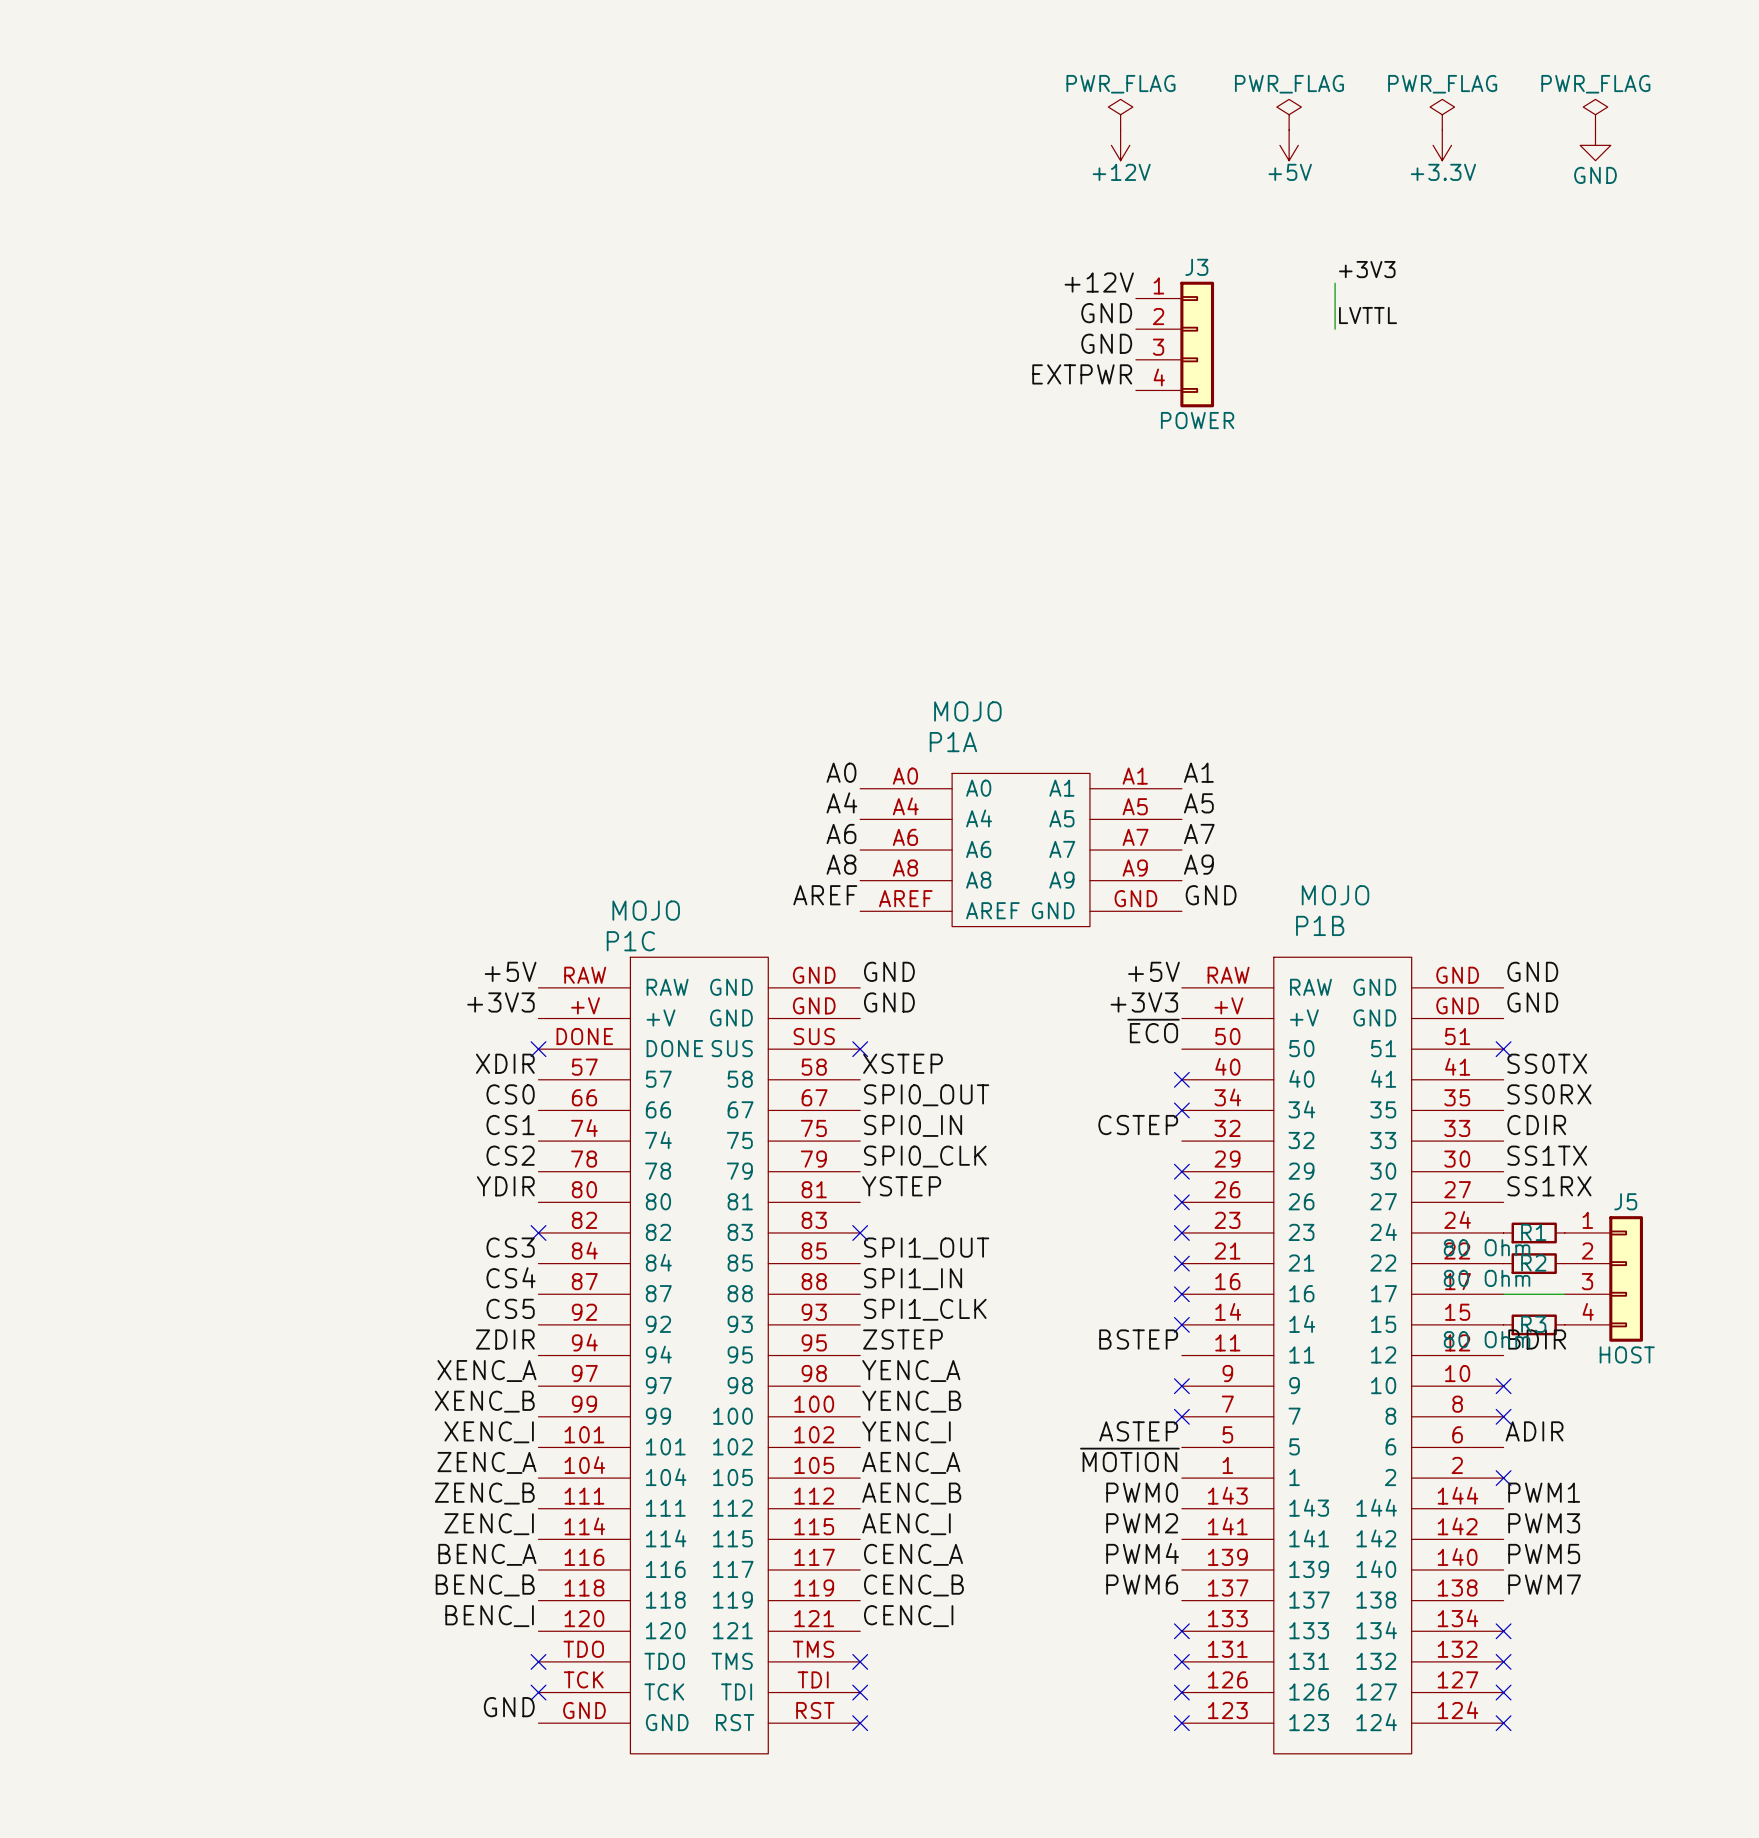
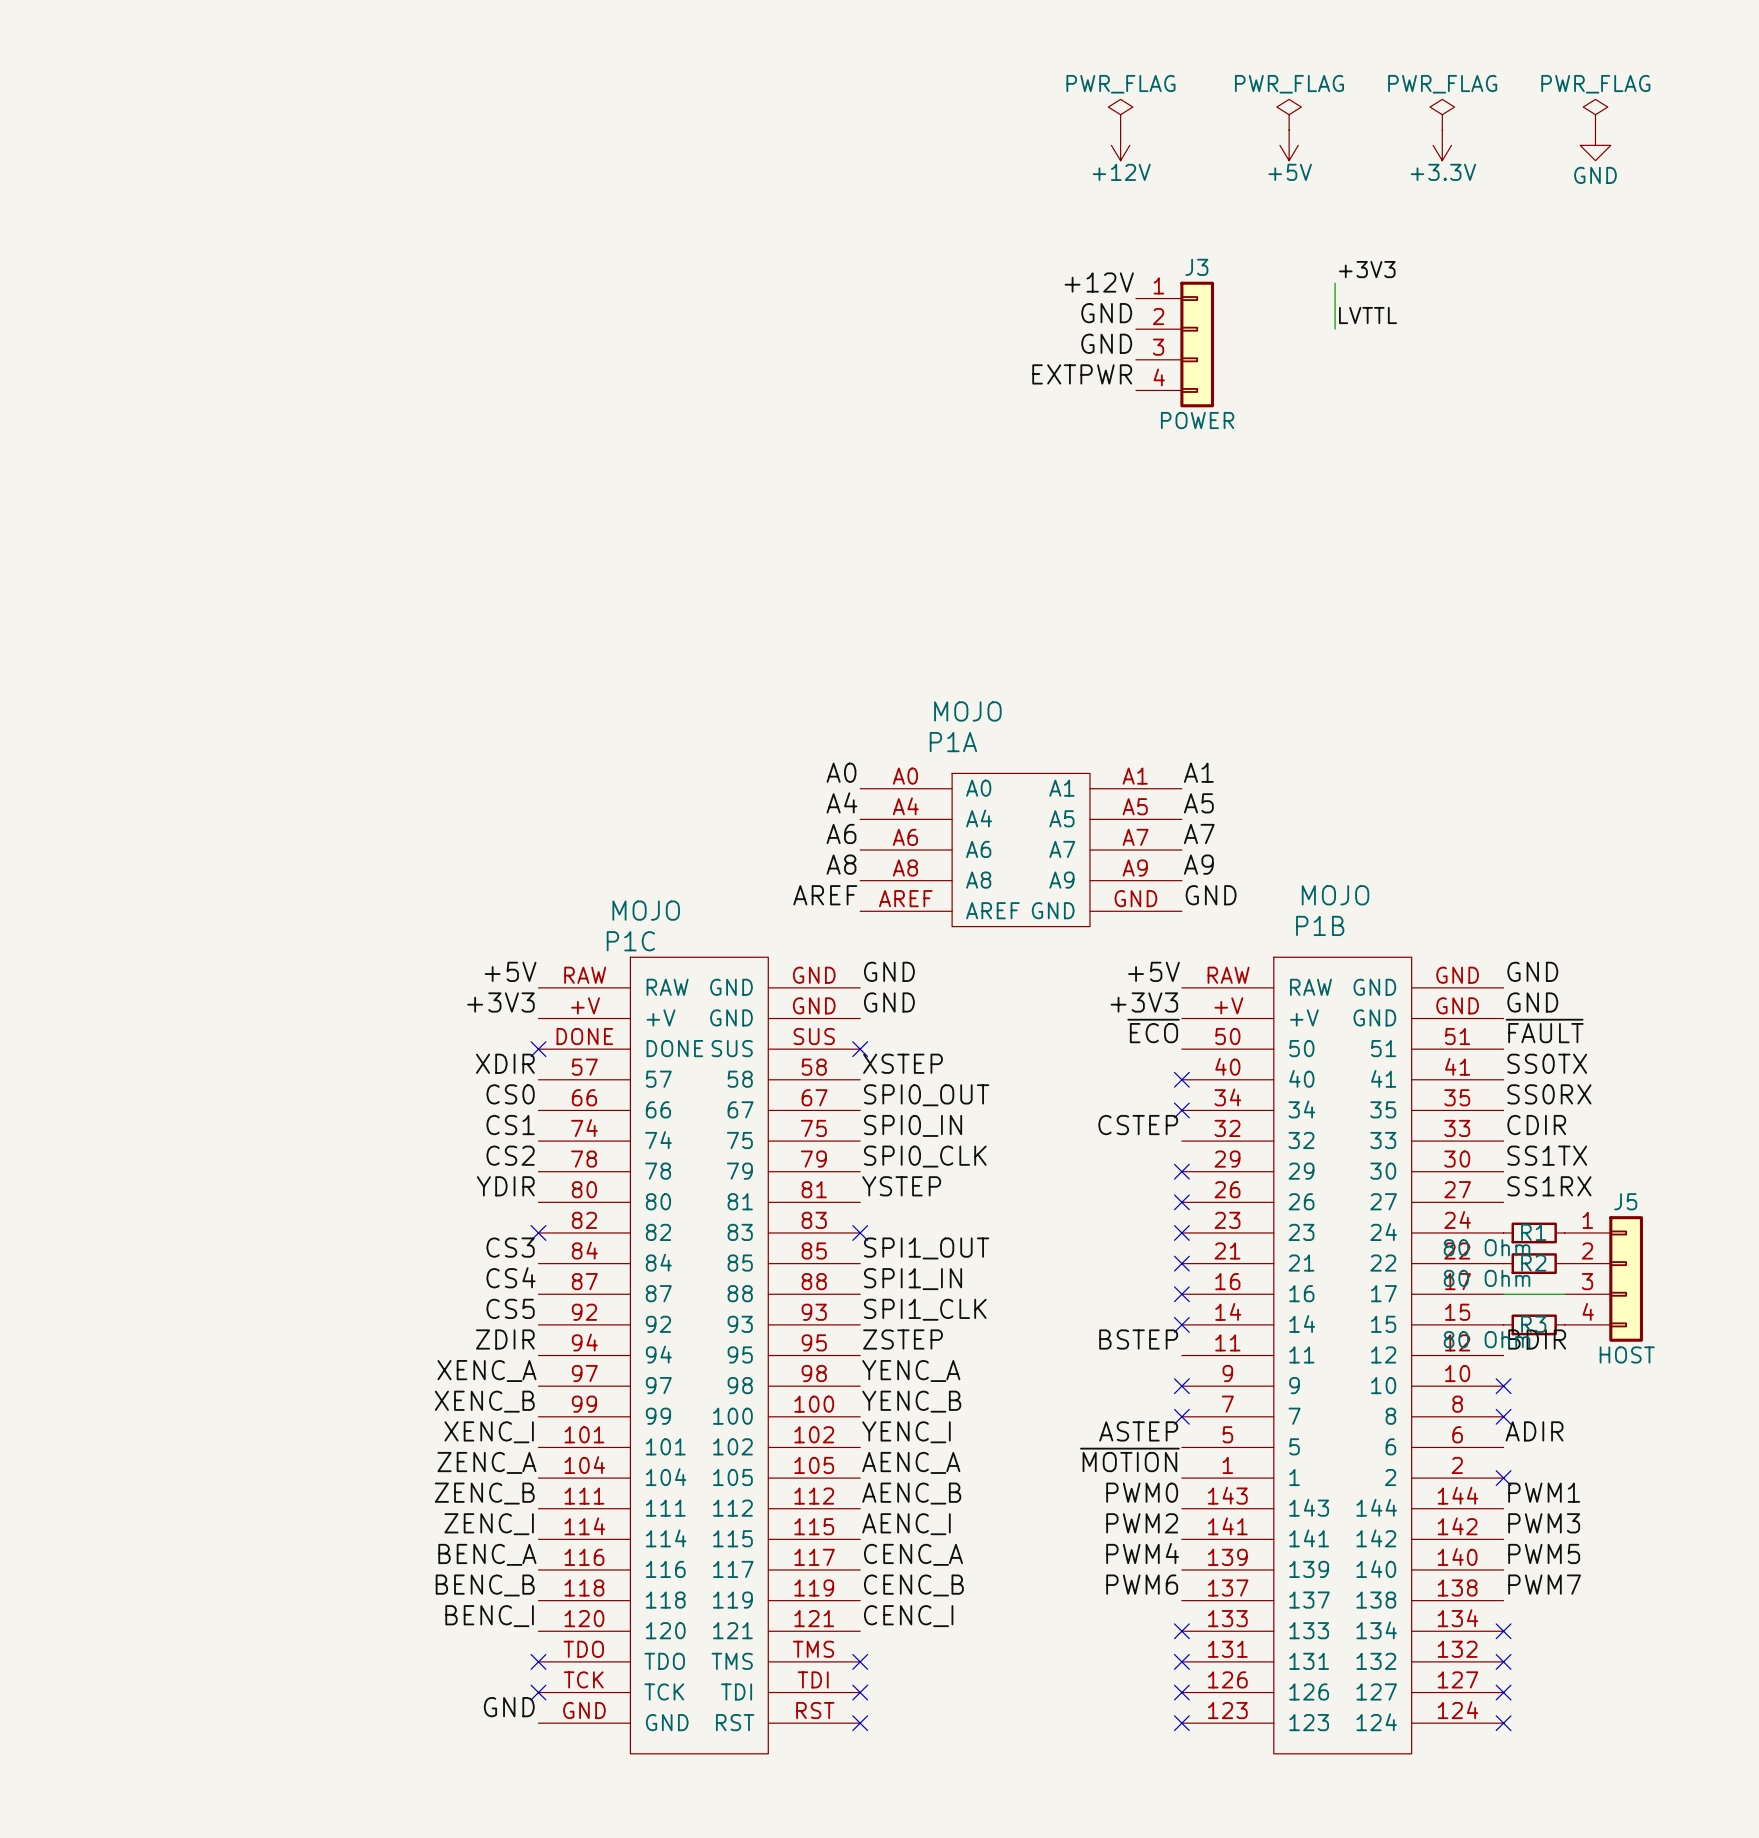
label: none -> ~{FAULT} (1544, 1031)
no-connect mark: (1503, 1049) -> none

